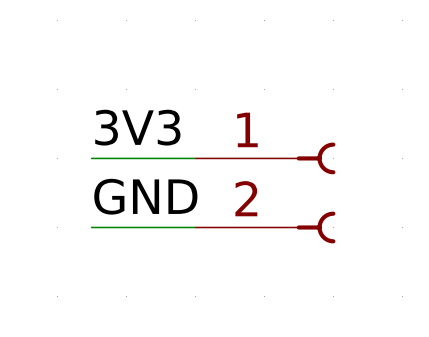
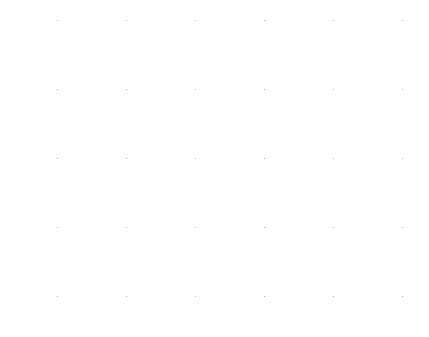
label: 3V3 (137, 127) -> none
wire: (91, 158) (195, 158) -> none
part: (265, 192) -> none
label: GND (145, 196) -> none
wire: (91, 227) (195, 227) -> none

